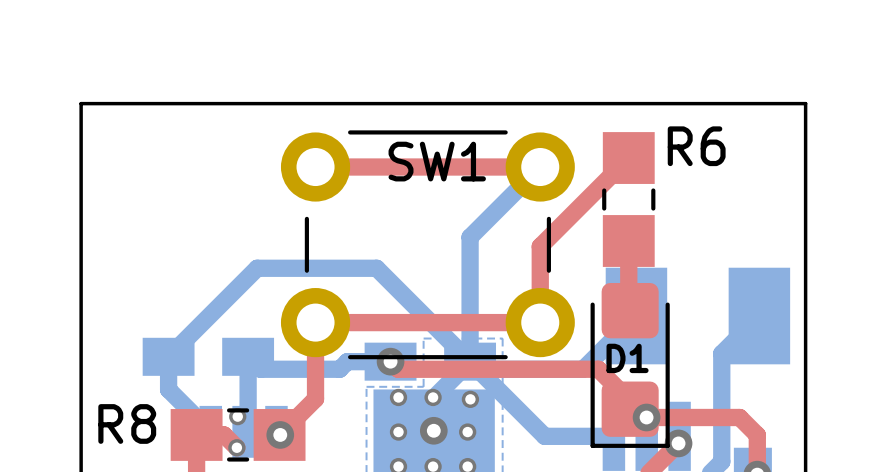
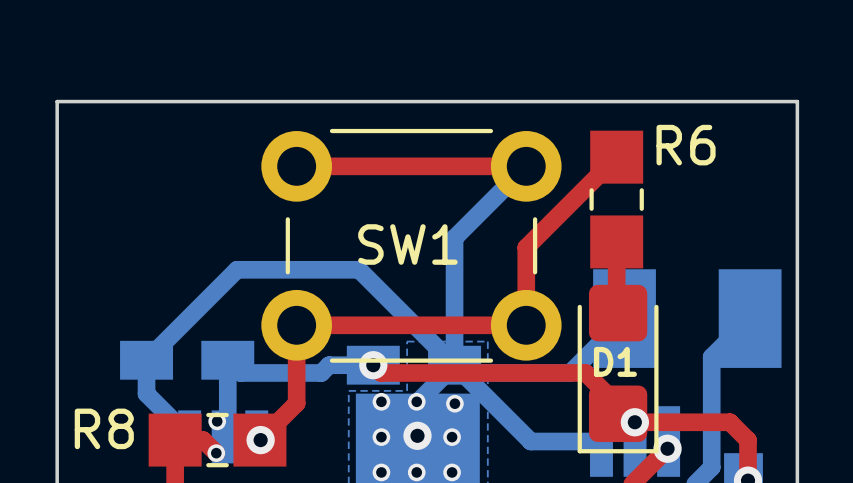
SW1 name position: SW1 (437, 161) -> SW1 (407, 244)

